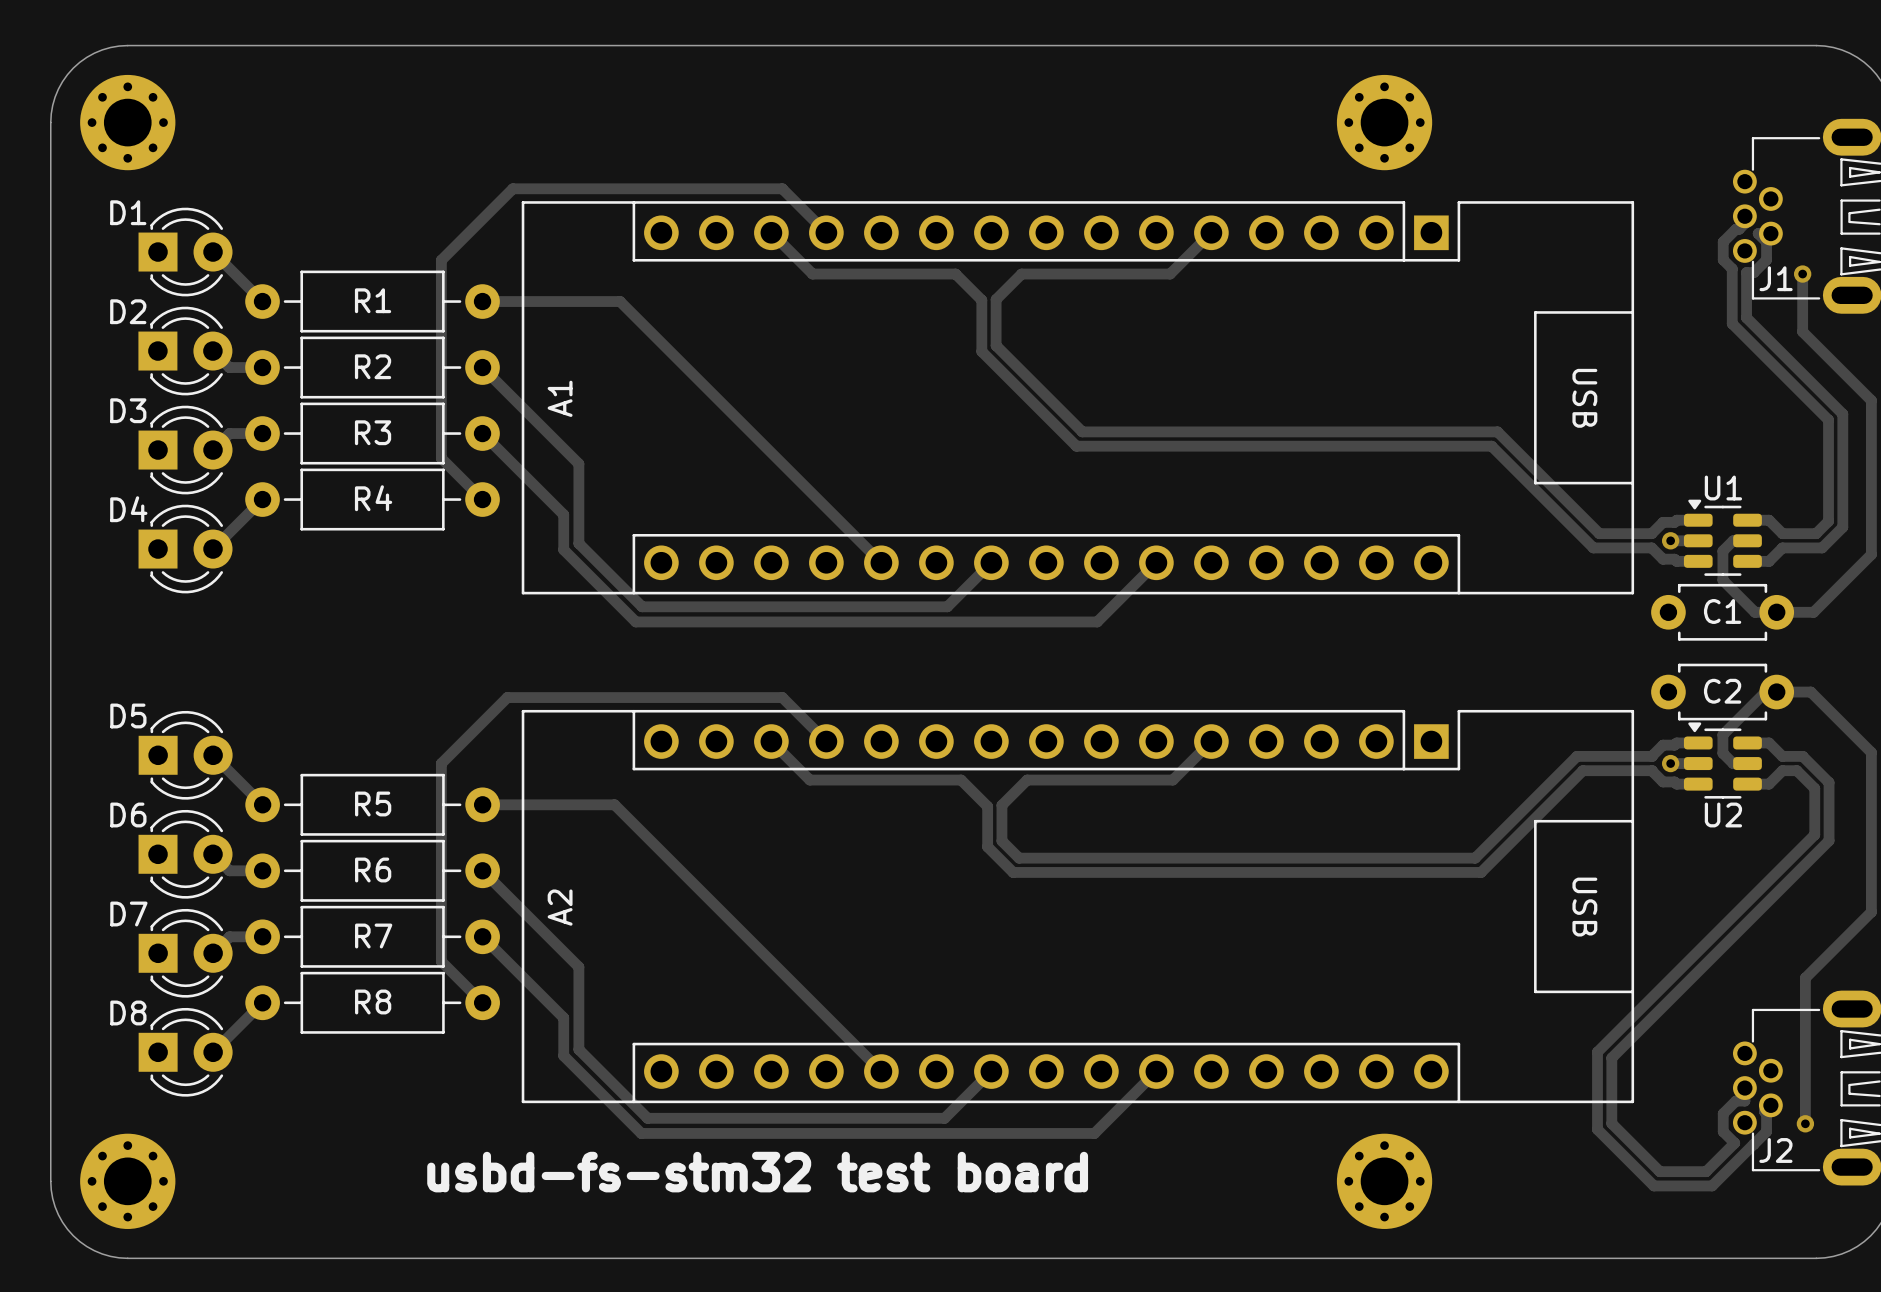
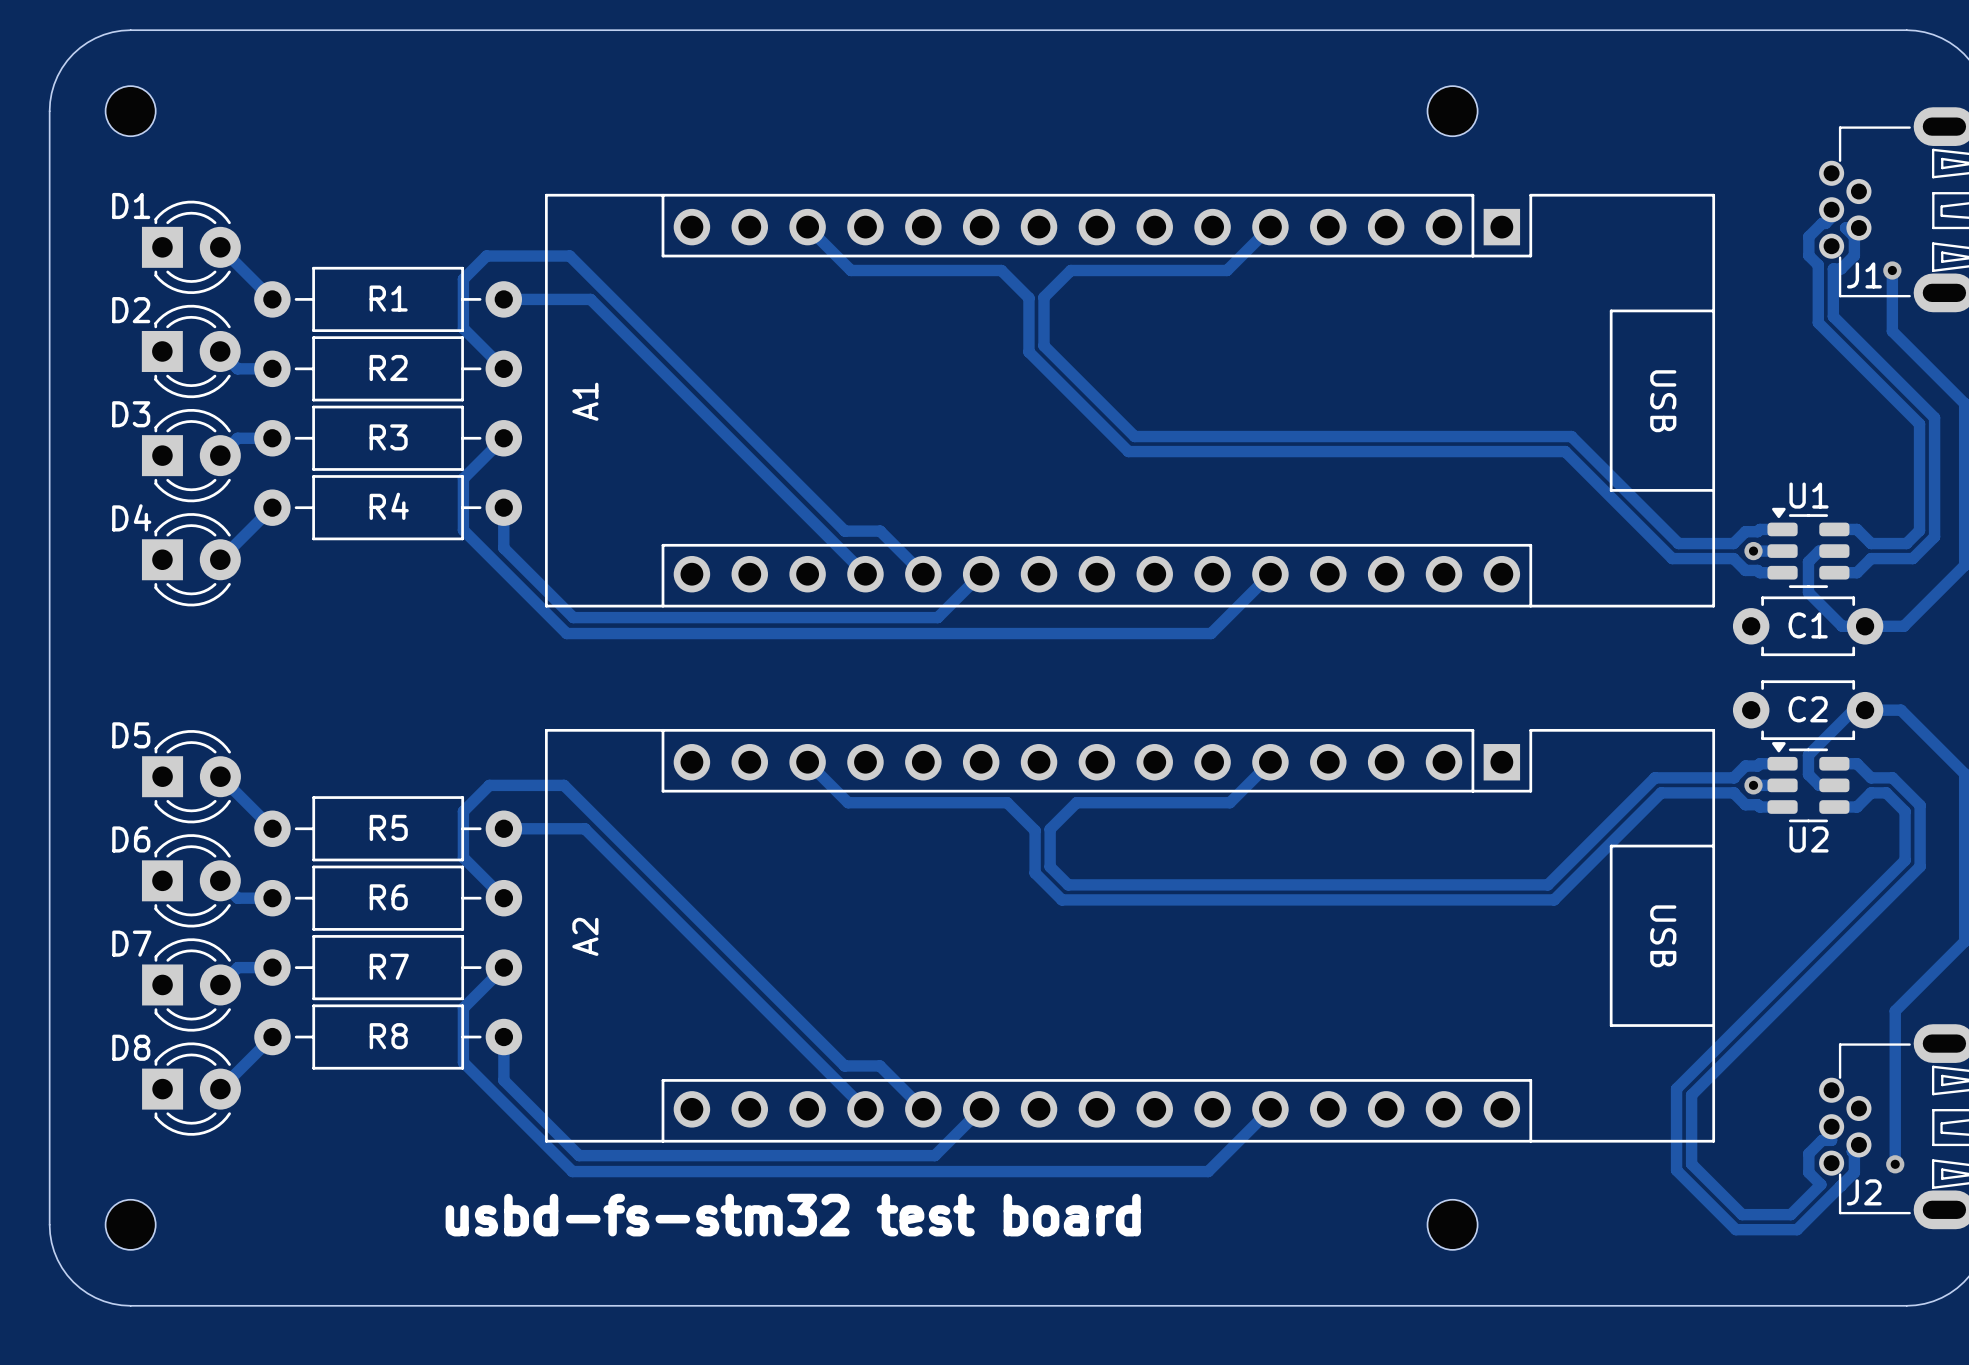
part footprint: [80, 74, 176, 171] -> [105, 86, 156, 137]
part footprint: [1336, 74, 1433, 171] -> [1427, 86, 1478, 137]
track: (826, 232) (782, 188) (512, 188) (441, 260) (441, 458) (482, 499) -> (981, 574) (937, 617) (573, 617) (503, 548) (503, 507)
track: (565, 301) (620, 301) (840, 521) -> (590, 299) (865, 574)
track: (482, 367) (578, 463) (578, 543) (642, 606) (947, 606) (991, 562) -> (503, 368) (463, 328) (463, 279) (486, 256) (569, 256) (844, 531) (880, 531)
track: (482, 433) (563, 514) (563, 549) (635, 621) (1097, 621) (1156, 562) -> (503, 438) (463, 478) (463, 530) (566, 633) (1211, 633) (1270, 574)
track: (826, 741) (782, 697) (507, 697) (441, 763) (441, 961) (482, 1002) -> (981, 1109) (934, 1155) (579, 1155) (503, 1080) (503, 1037)
track: (559, 804) (614, 804) (840, 1030) -> (584, 828) (865, 1109)
track: (482, 870) (578, 967) (578, 1049) (647, 1118) (944, 1118) (991, 1071) -> (503, 898) (463, 857) (463, 811) (489, 785) (564, 785) (844, 1065) (879, 1065)
track: (482, 936) (563, 1017) (563, 1055) (641, 1133) (1094, 1133) (1156, 1071) -> (503, 967) (463, 1008) (463, 1062) (572, 1171) (1208, 1171) (1270, 1109)
part footprint: [80, 1133, 176, 1229] -> [105, 1199, 156, 1250]
part footprint: [1336, 1133, 1433, 1229] -> [1427, 1199, 1478, 1250]

